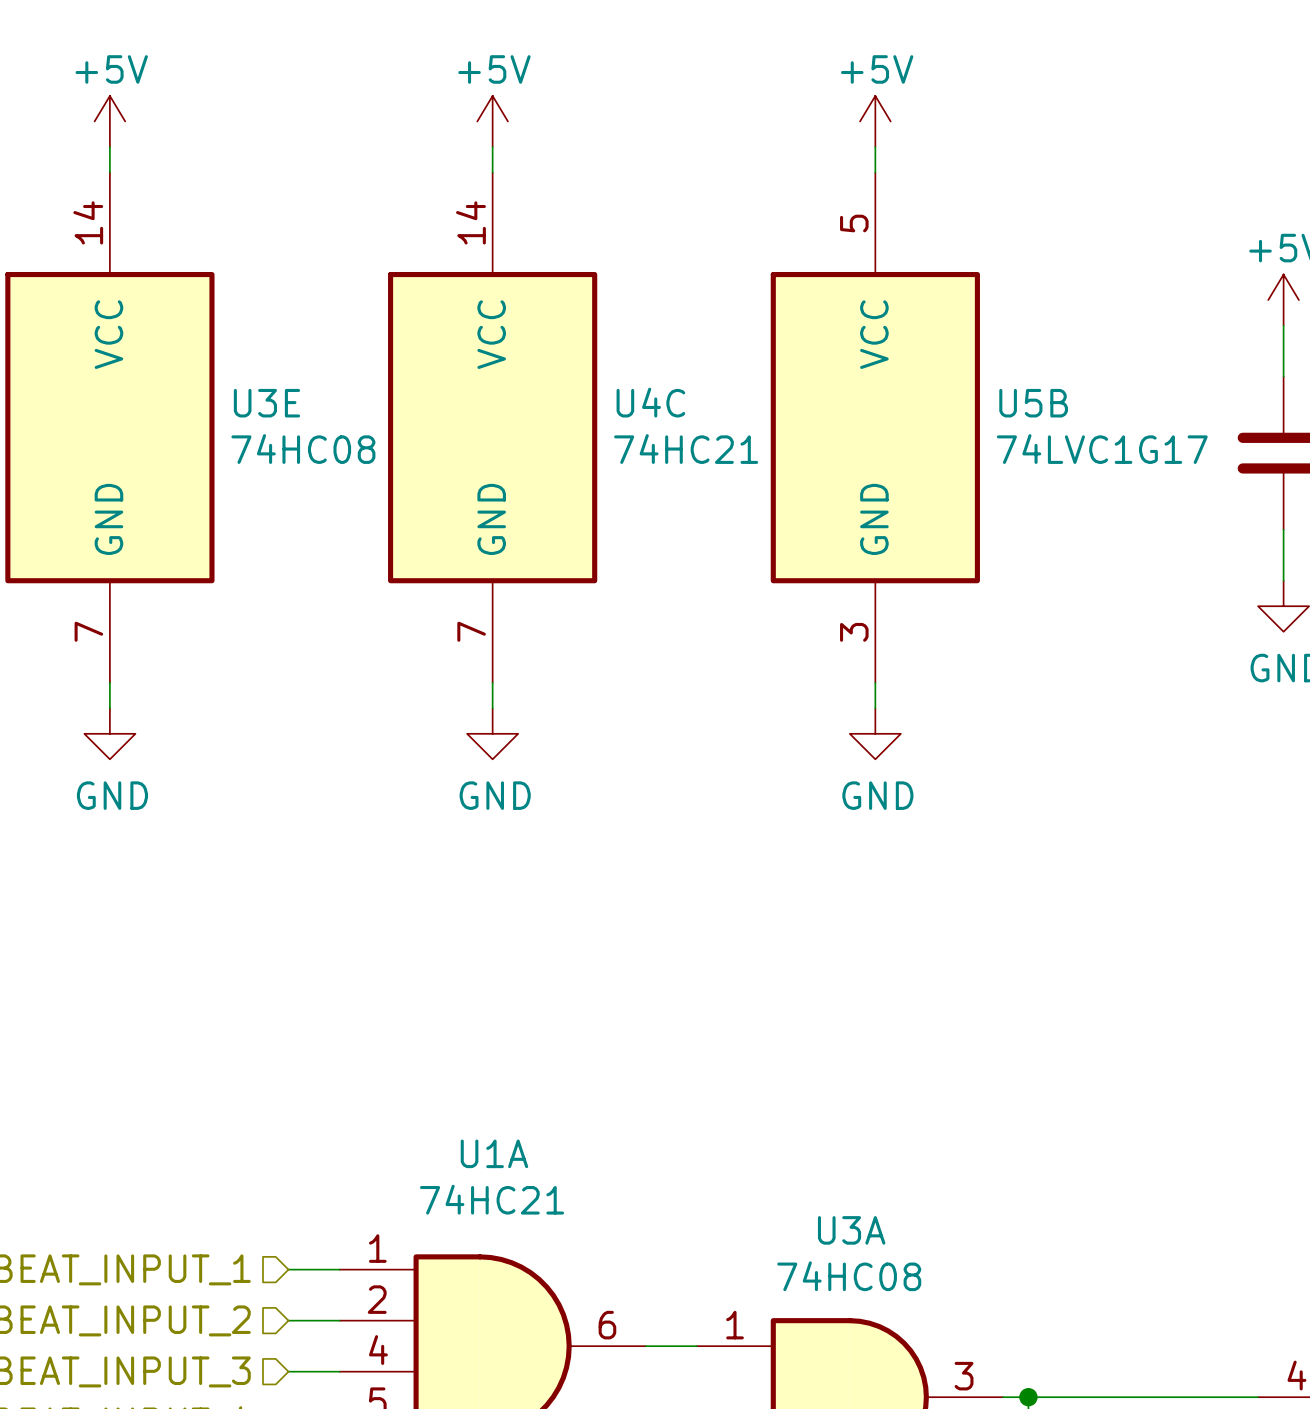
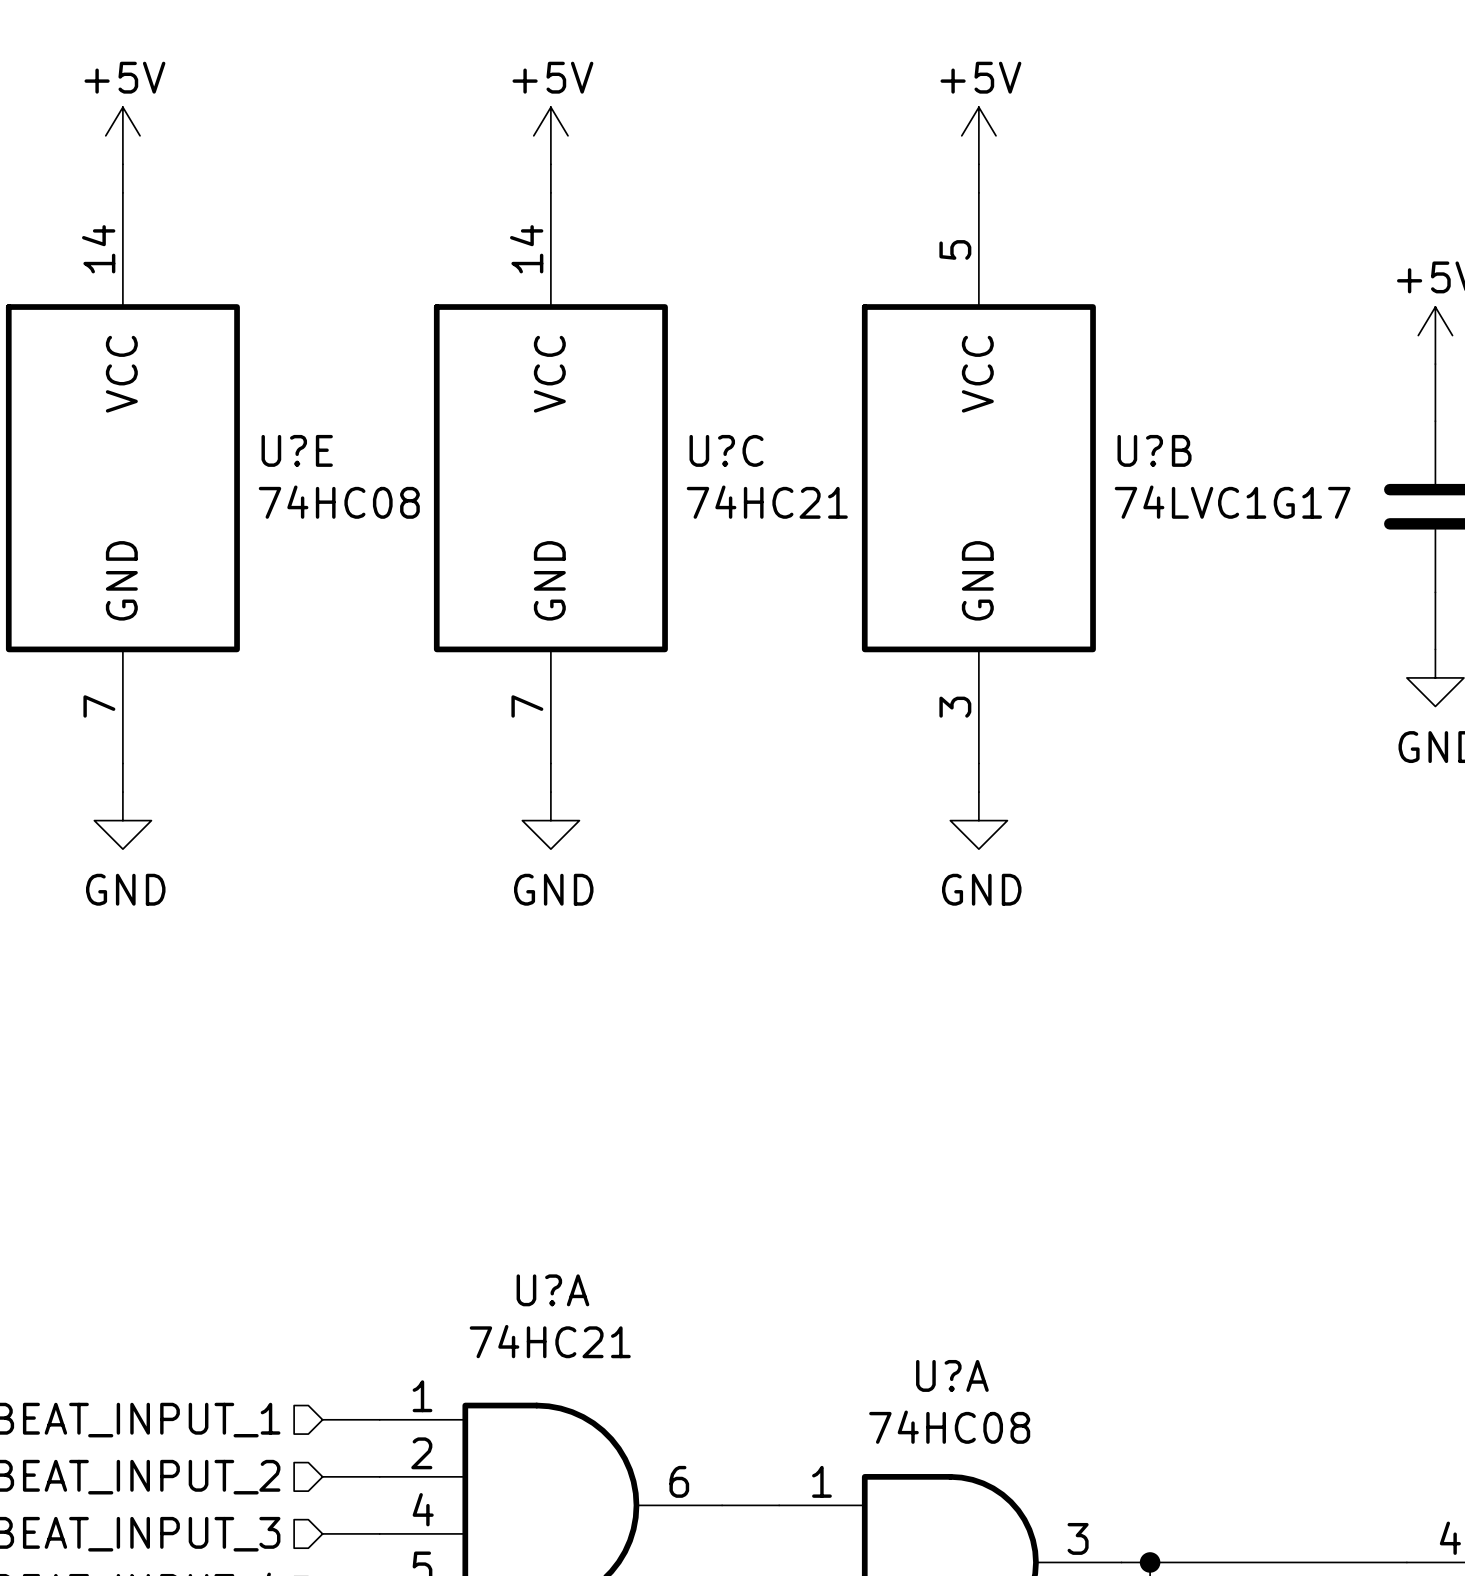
U4C name: U4C (650, 402) -> U?C (726, 450)
U3E name: U3E (266, 403) -> U?E (297, 450)
U5B name: U5B (1033, 403) -> U?B (1154, 450)
U1A name: U1A (494, 1153) -> U?A (552, 1290)
U3A name: U3A (851, 1230) -> U?A (952, 1375)

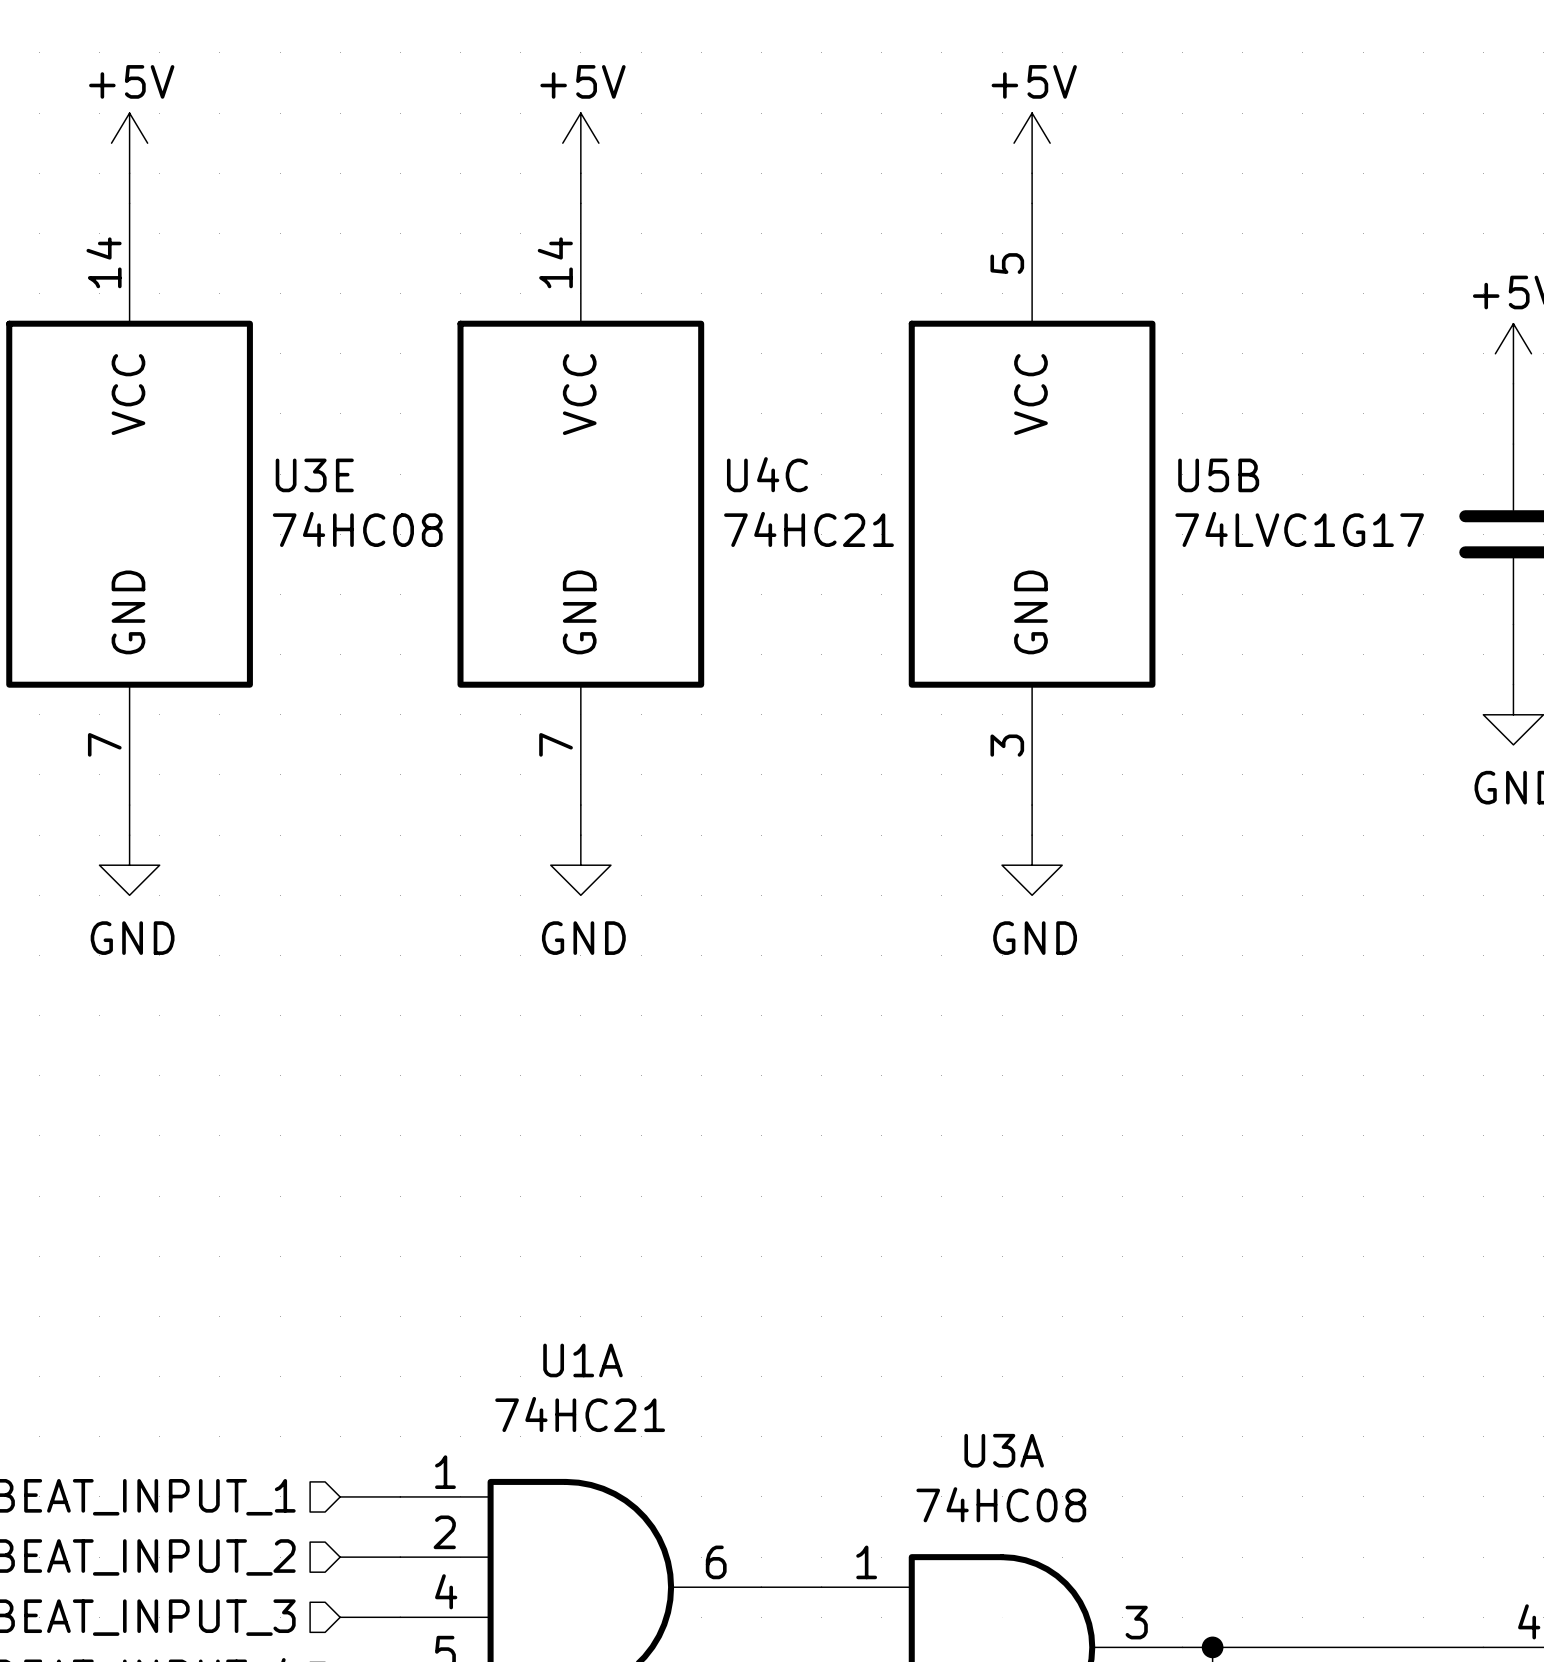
U?E name: U?E (297, 450) -> U3E (314, 475)
U?C name: U?C (726, 450) -> U4C (767, 474)
U?B name: U?B (1154, 450) -> U5B (1218, 475)
U?A name: U?A (552, 1290) -> U1A (582, 1360)
U?A name: U?A (952, 1375) -> U3A (1004, 1450)

